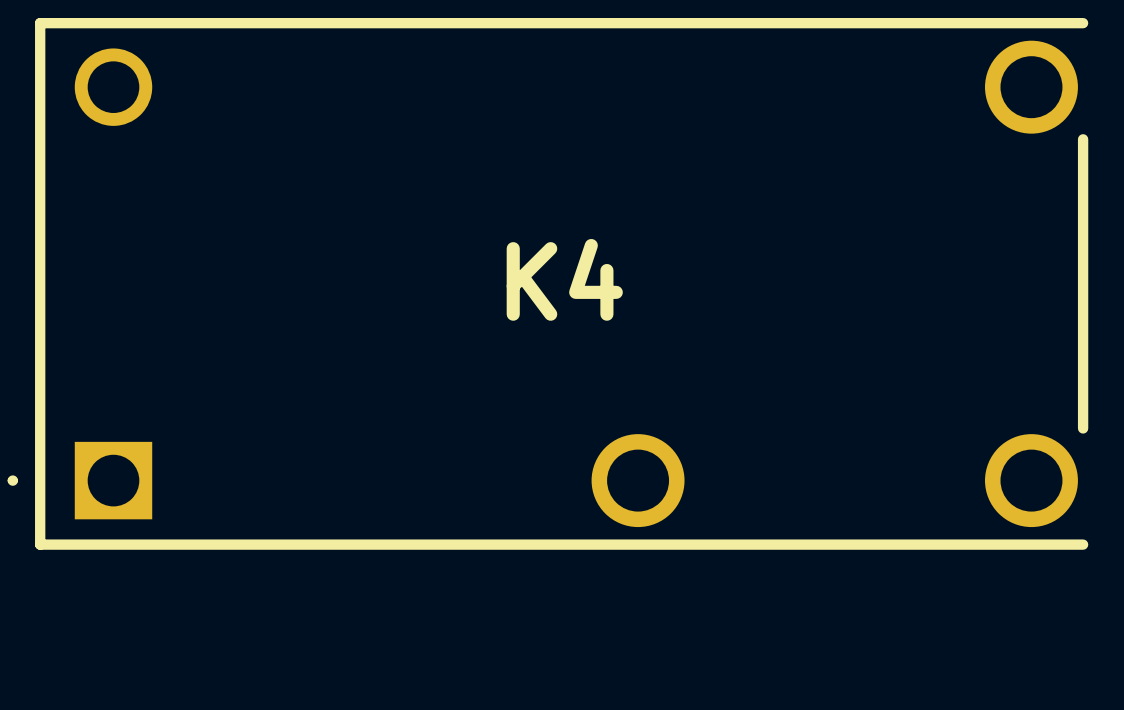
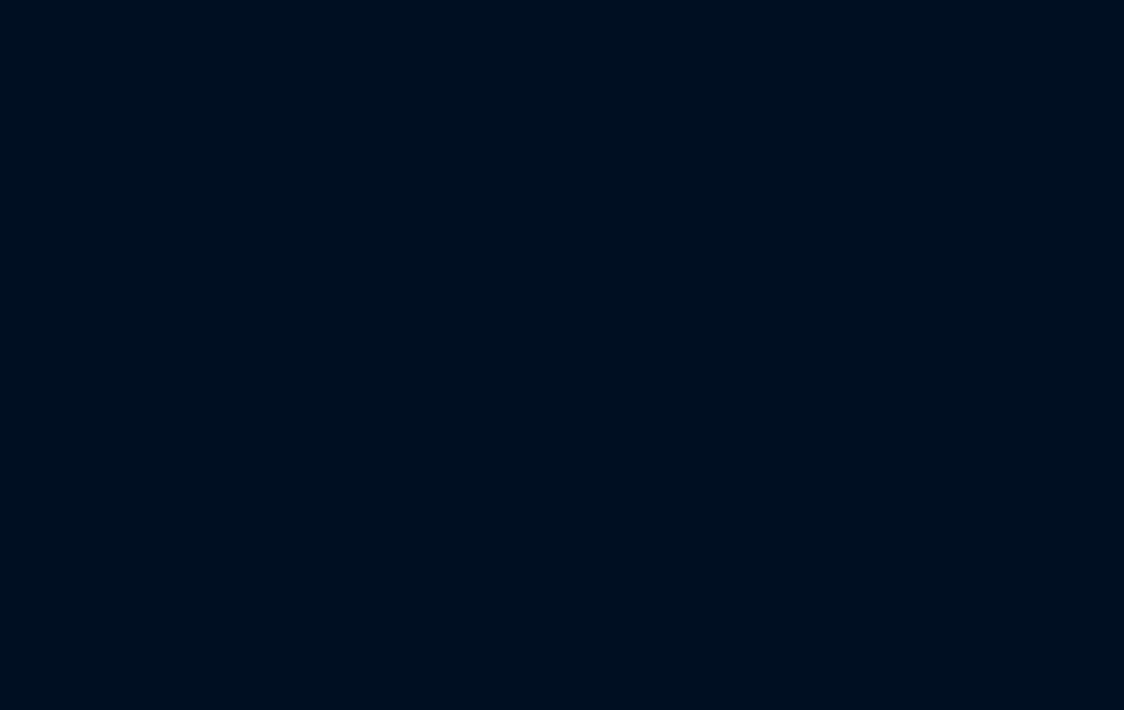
K4: (547, 283) -> none

